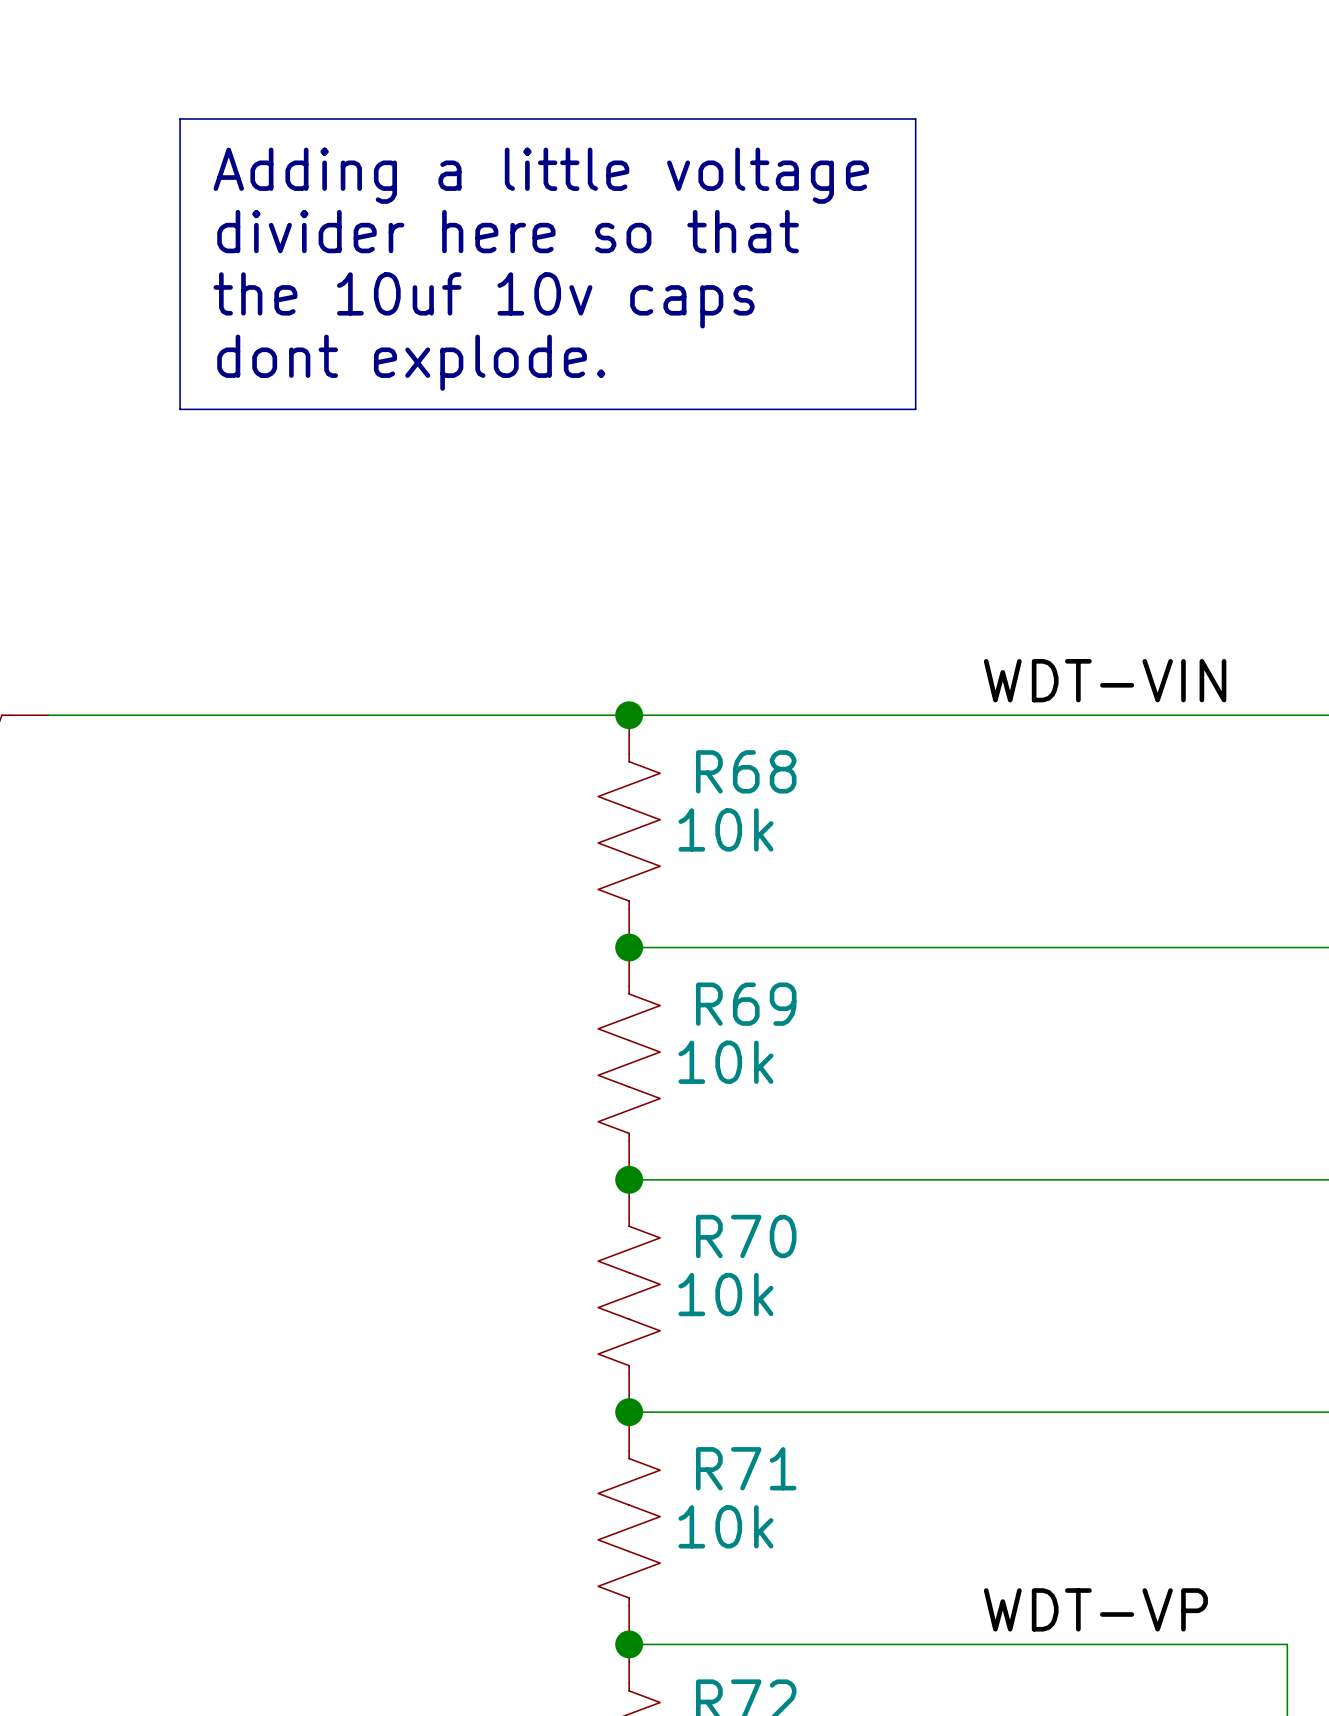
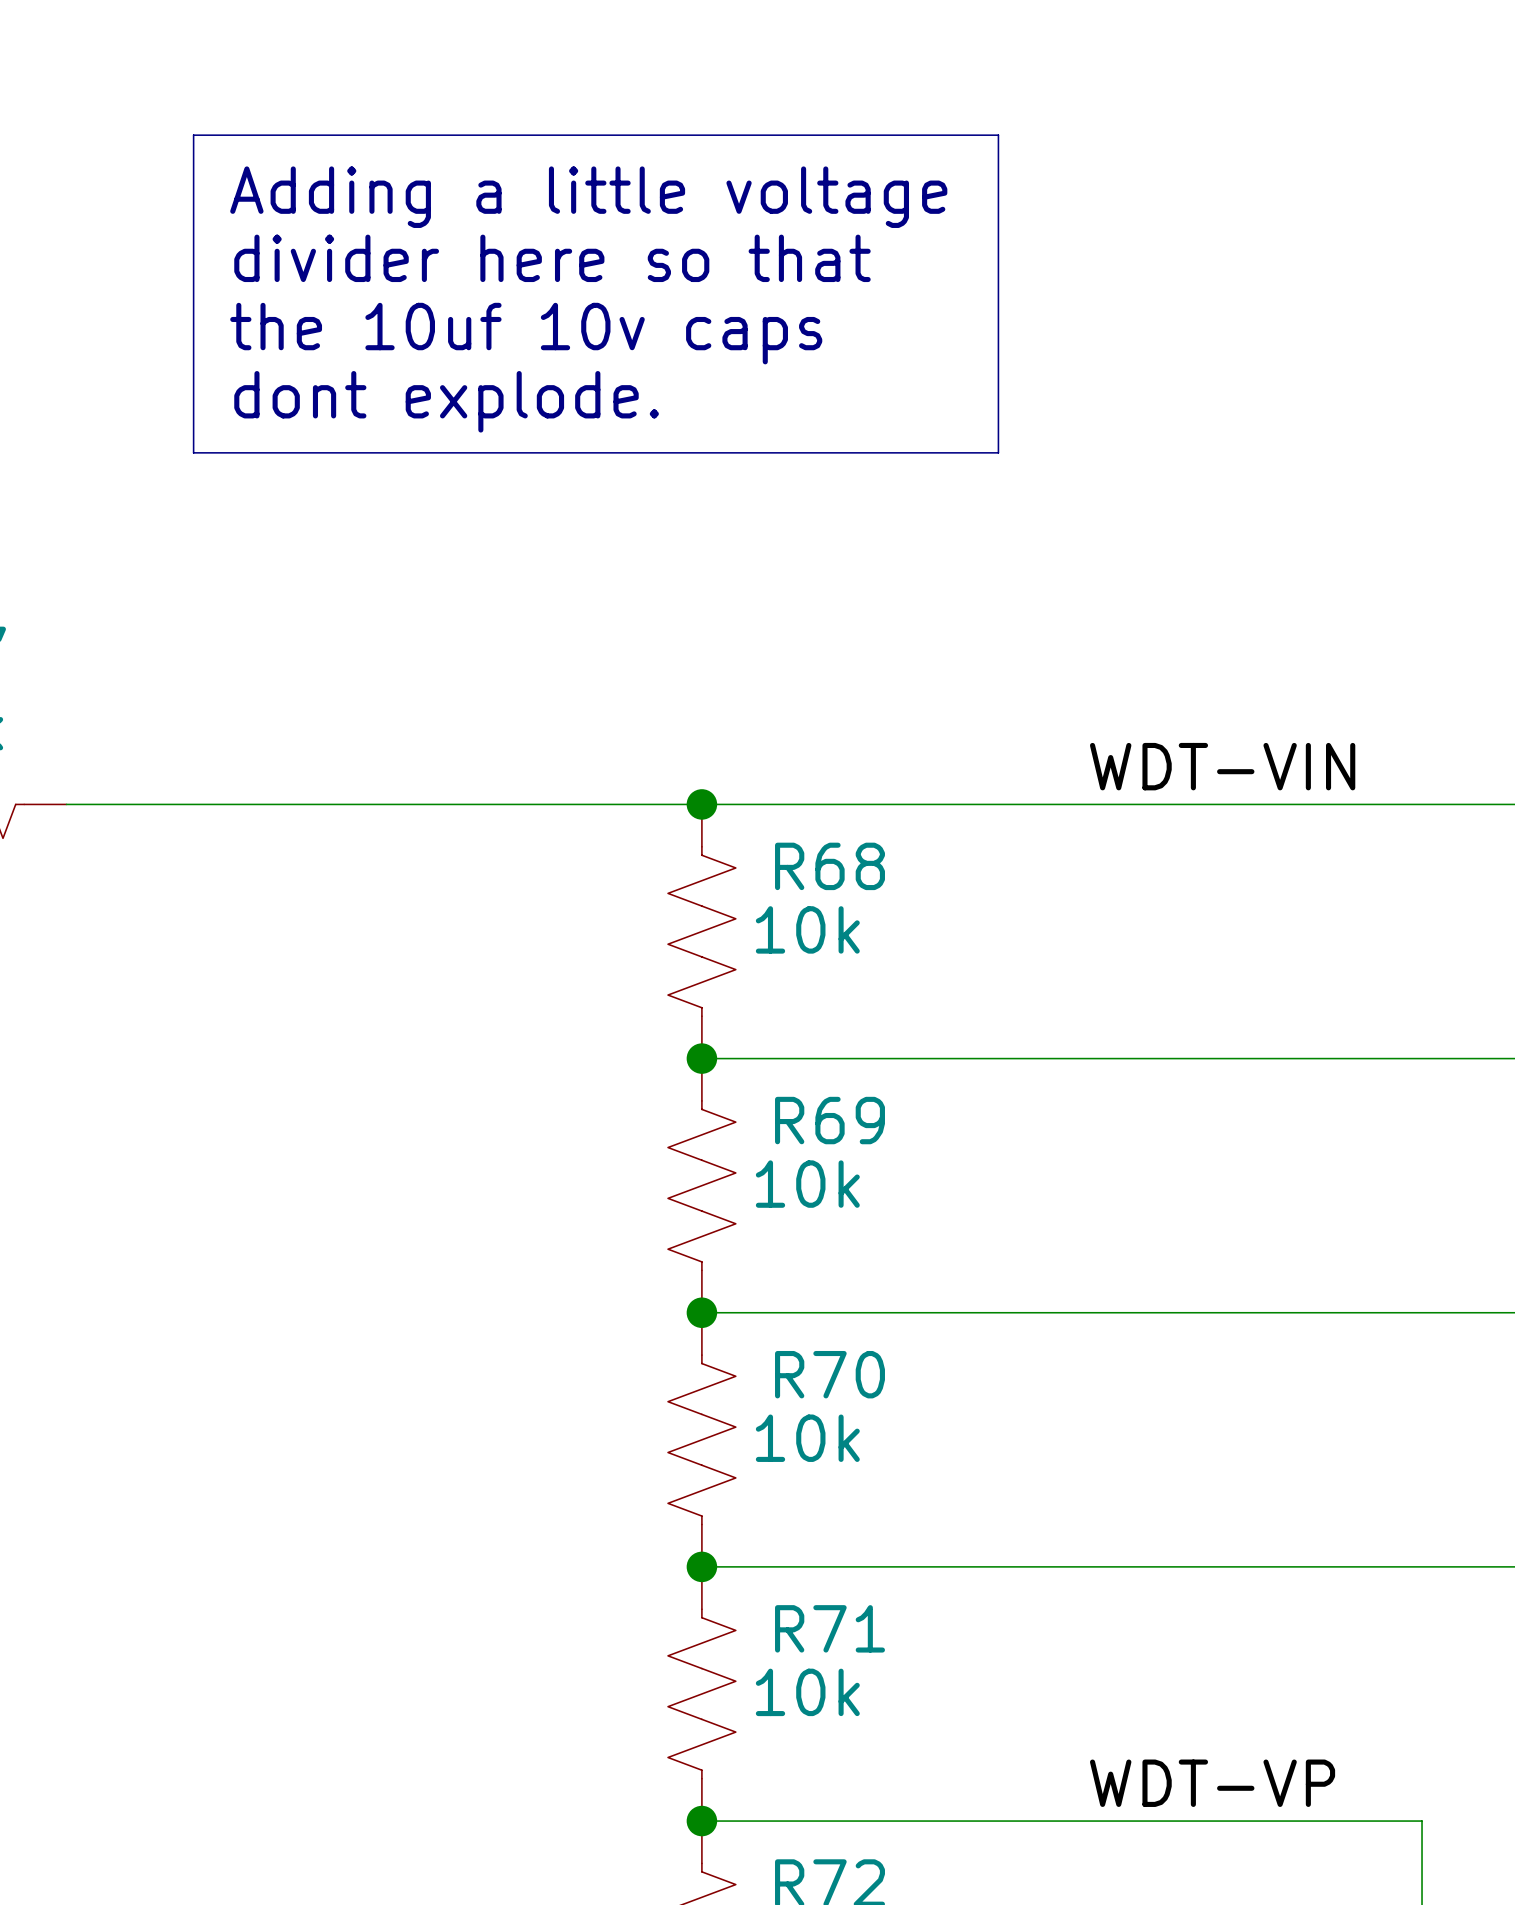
line: (180, 119) (915, 119) (915, 409) (180, 409) (180, 119) -> (193, 135) (998, 135) (998, 452) (193, 452) (193, 135)
text position: Adding a little voltage (541, 175) -> Adding a little voltage (588, 197)
text position: divider here so that (508, 231) -> divider here so that (552, 258)
text position: the 10uf 10v caps (484, 300) -> the 10uf 10v caps (526, 333)
text position: dont explode. (411, 362) -> dont explode. (446, 401)

